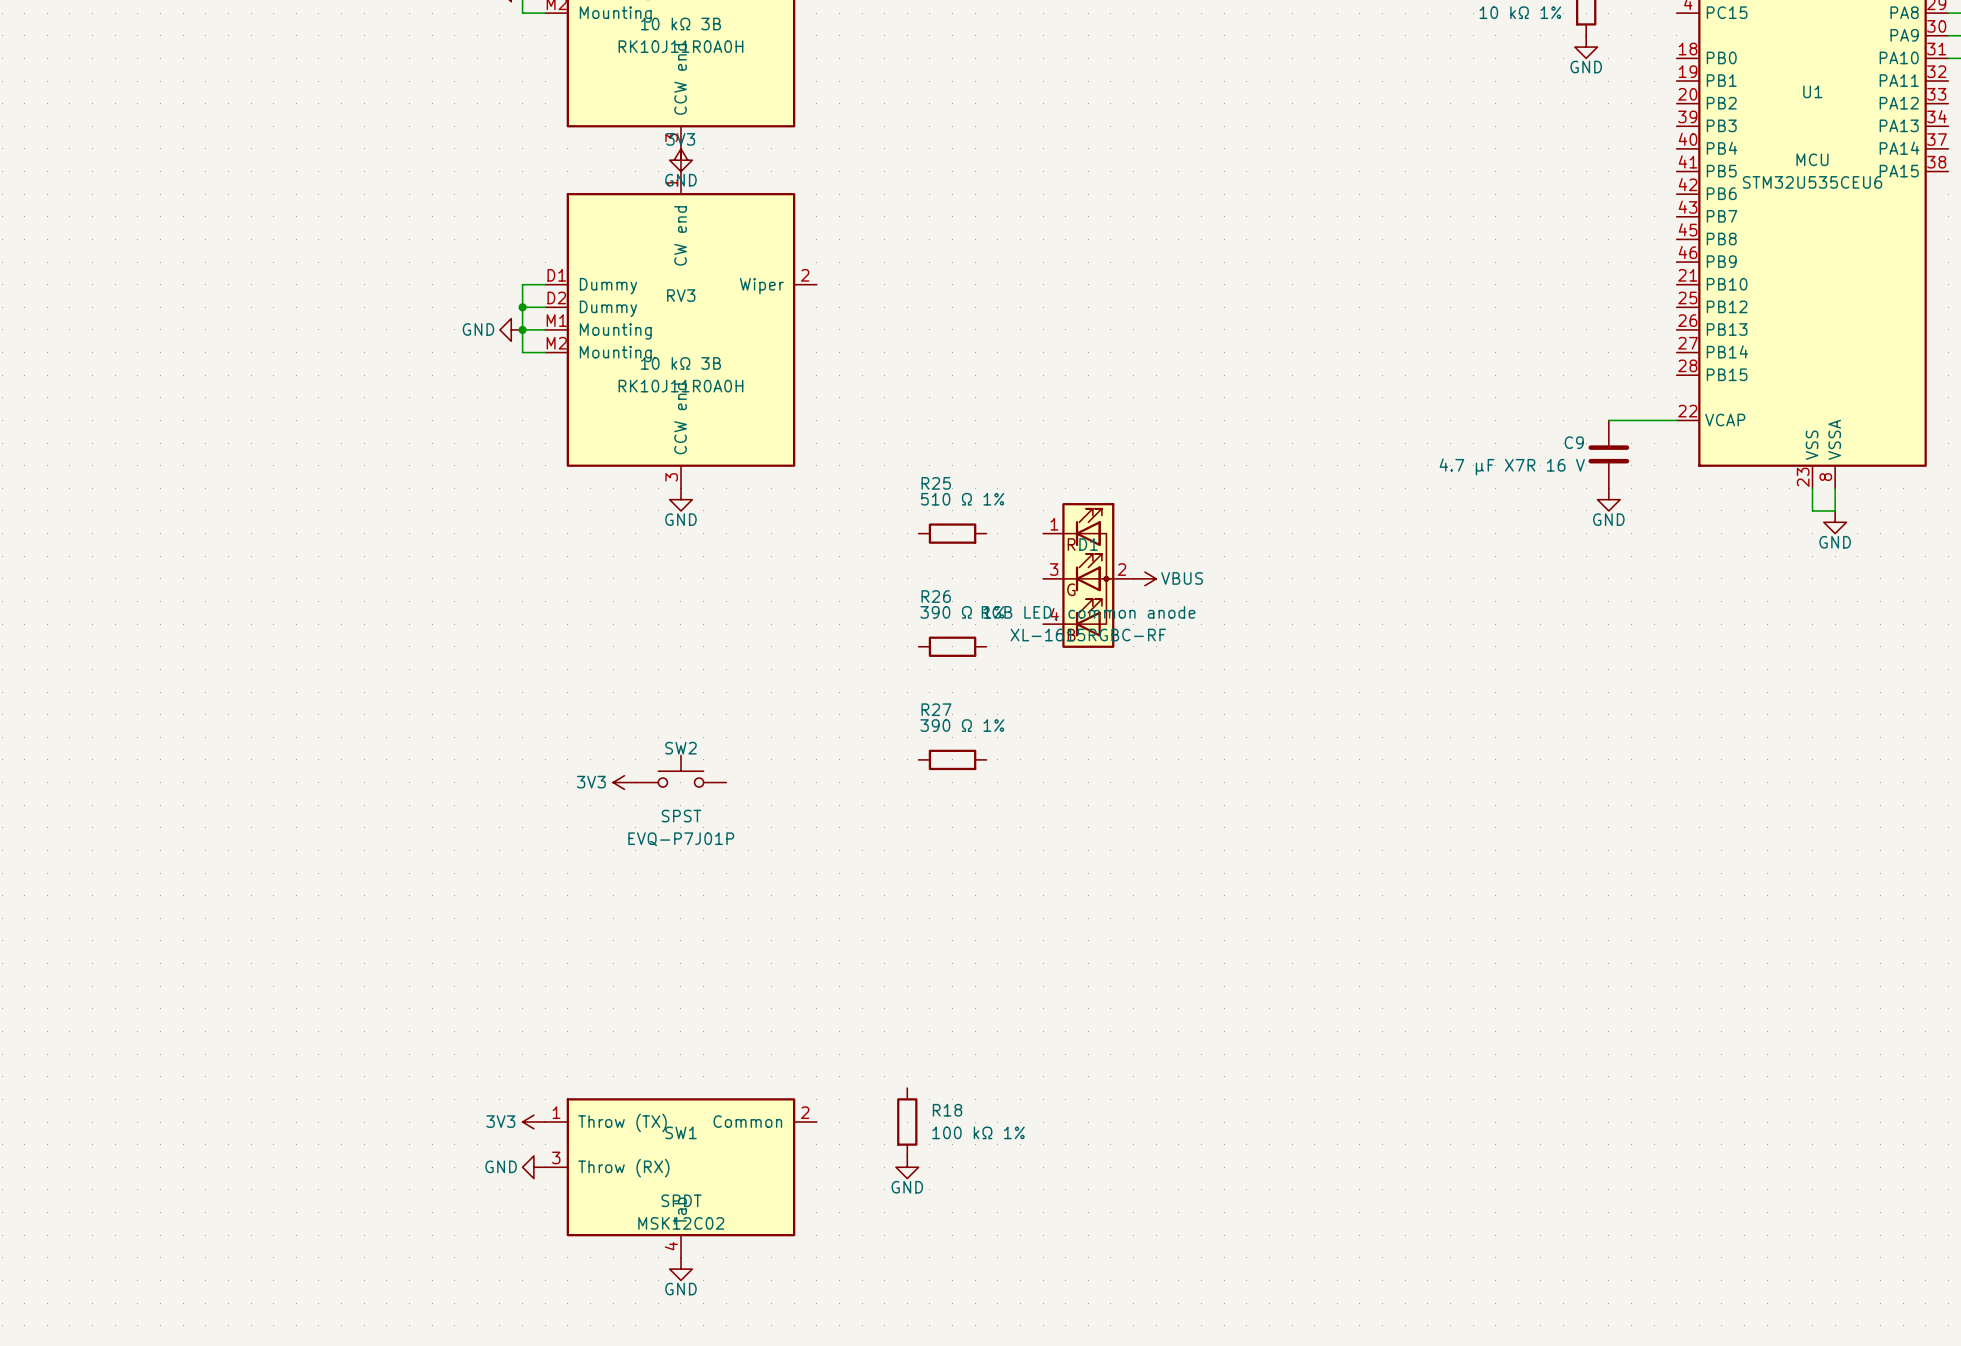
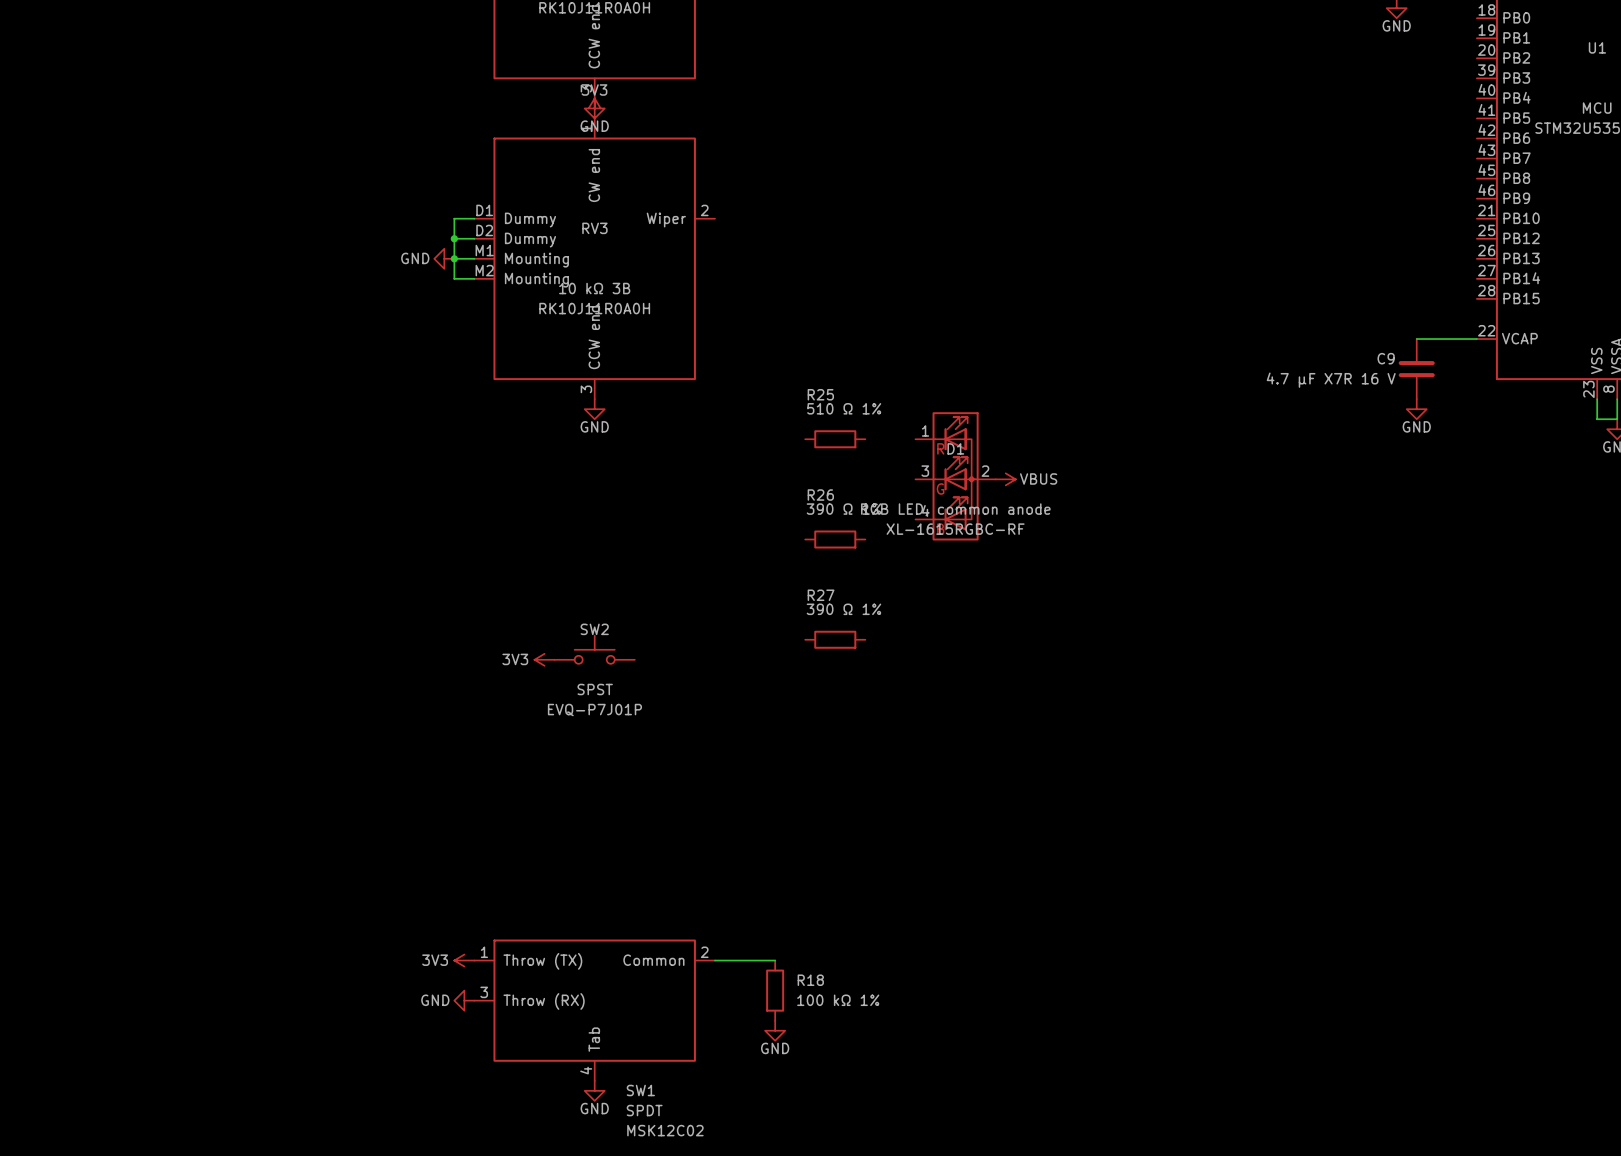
wire: none -> (714, 960) (775, 960)
R18 position: (907, 1122) -> (775, 990)
SW1 name position: SW1 (680, 1132) -> SW1 (640, 1090)
power symbol position: GND (907, 1167) -> GND (775, 1030)
SW1 value position: SPDT (681, 1200) -> SPDT (644, 1110)
SW1 text position: MSK12C02 (681, 1223) -> MSK12C02 (665, 1130)

